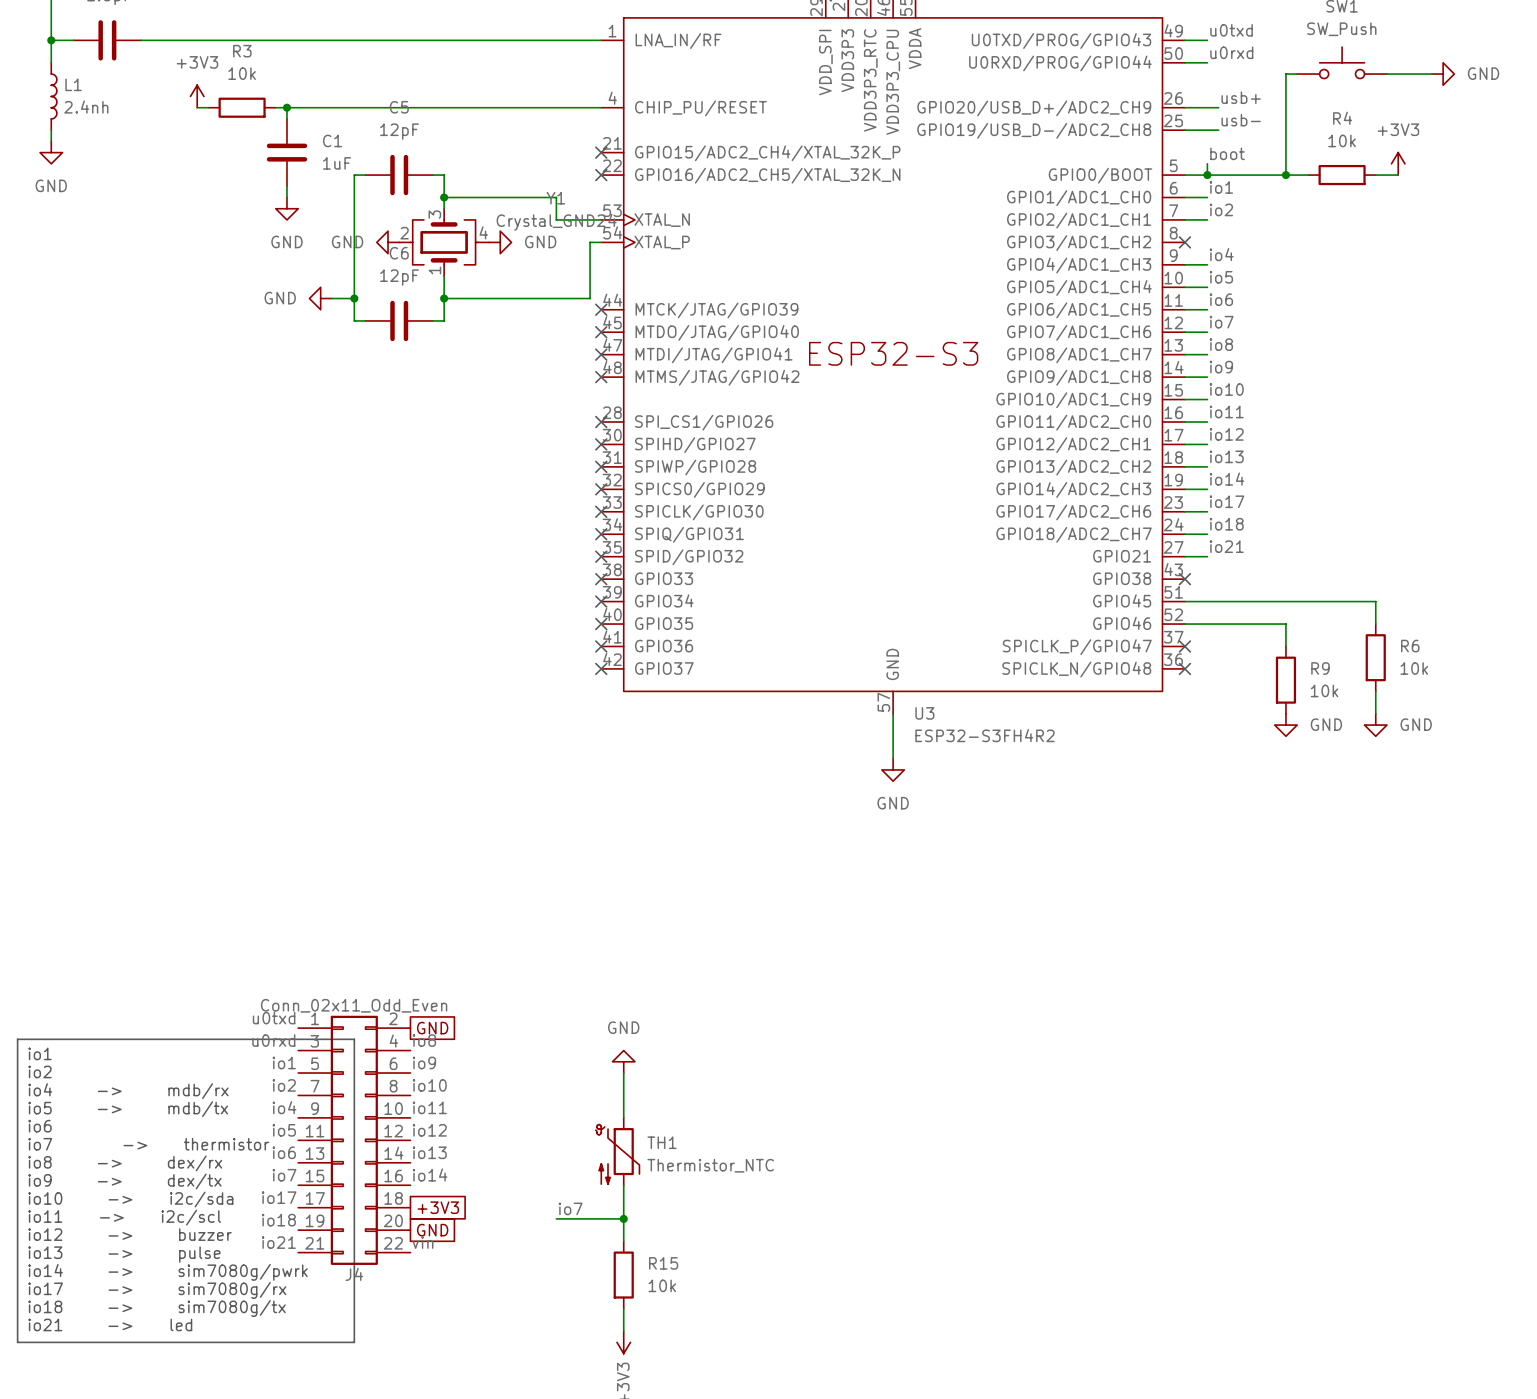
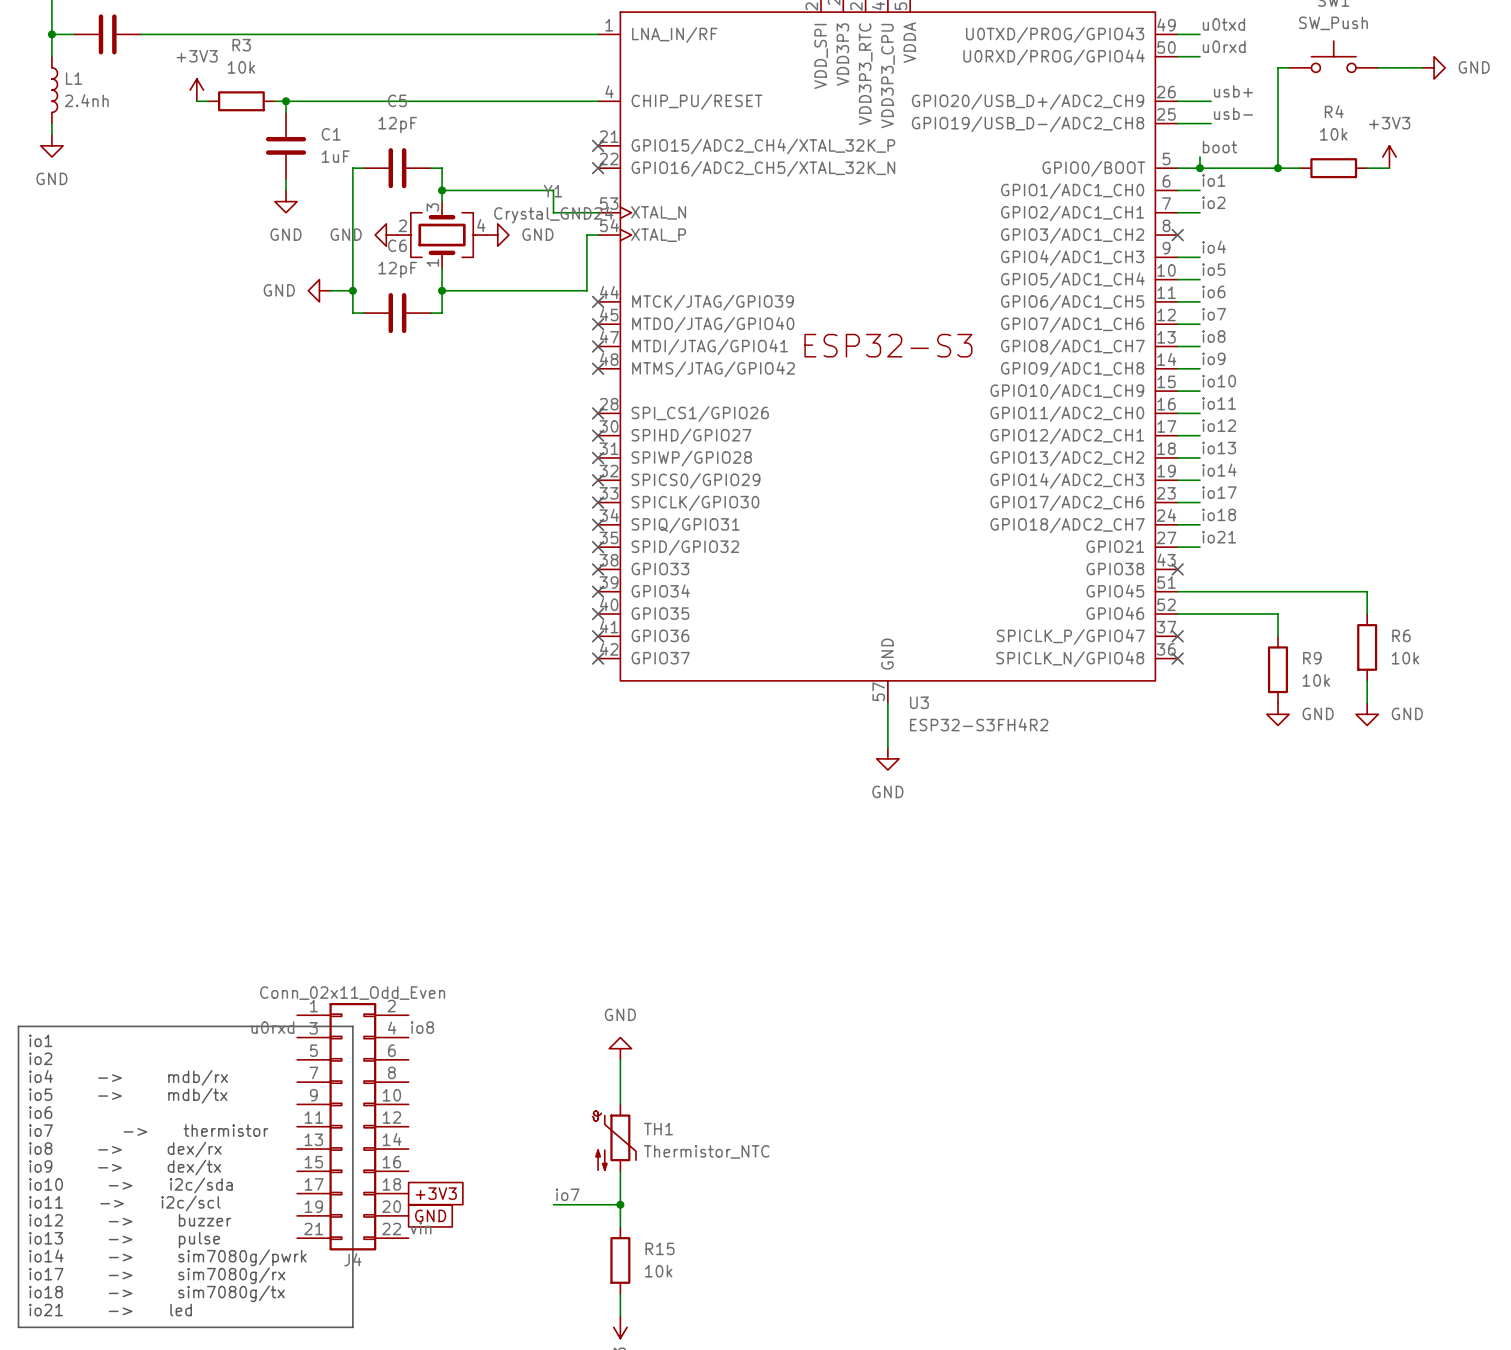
label: u0txd (274, 1018) -> none
global label: GND (432, 1028) -> none
label: io1 (284, 1062) -> none
label: io9 (424, 1062) -> none
label: io2 (284, 1085) -> none
label: io10 (429, 1085) -> none
label: io4 (284, 1107) -> none
label: io11 (429, 1107) -> none
label: io5 (284, 1130) -> none
label: io12 (429, 1130) -> none
label: io6 (284, 1152) -> none
label: io13 (429, 1152) -> none
label: io14 (430, 1174) -> none
label: io7 (284, 1175) -> none
label: io17 (279, 1197) -> none
label: io18 (278, 1220) -> none
label: io21 (278, 1242) -> none

